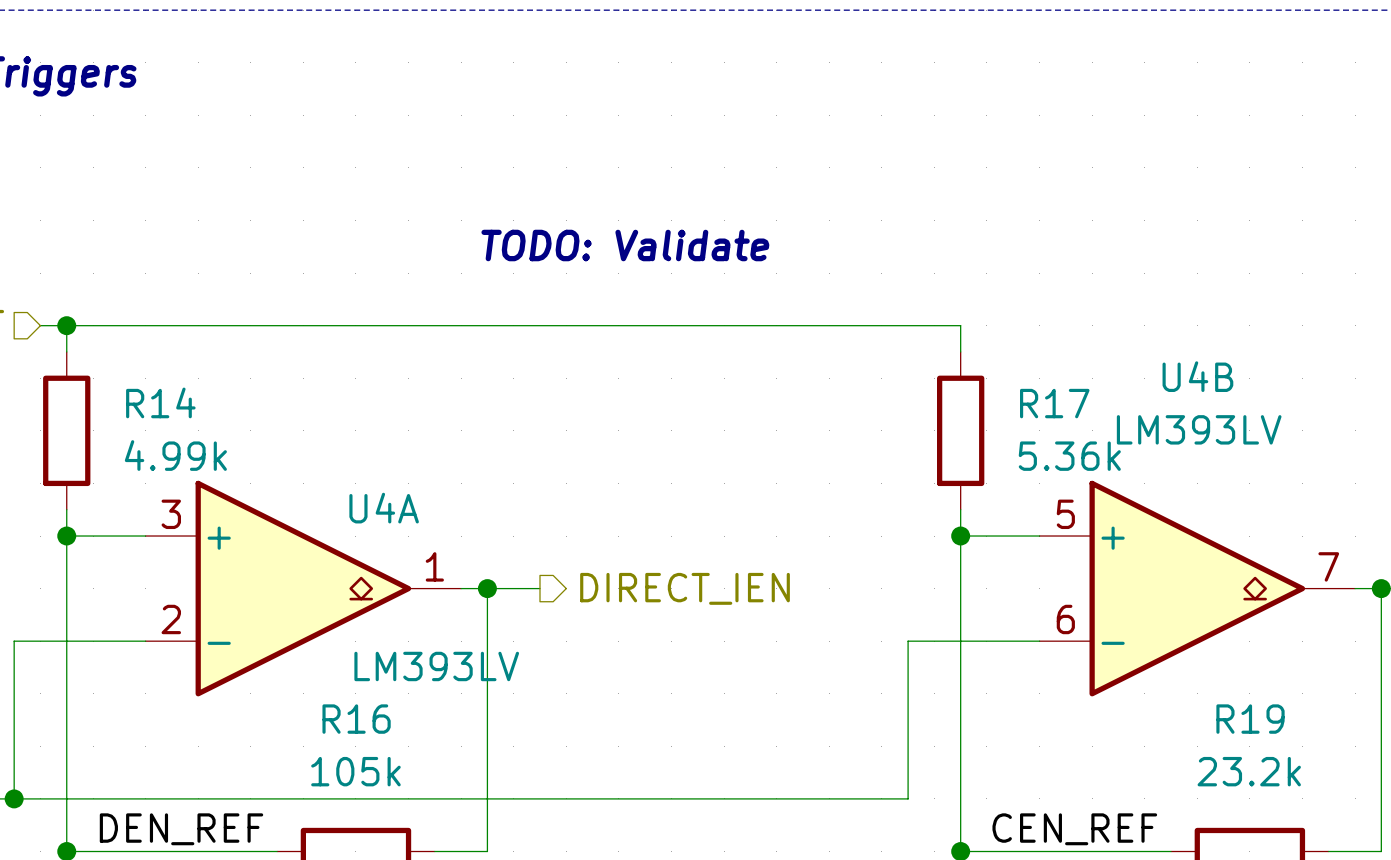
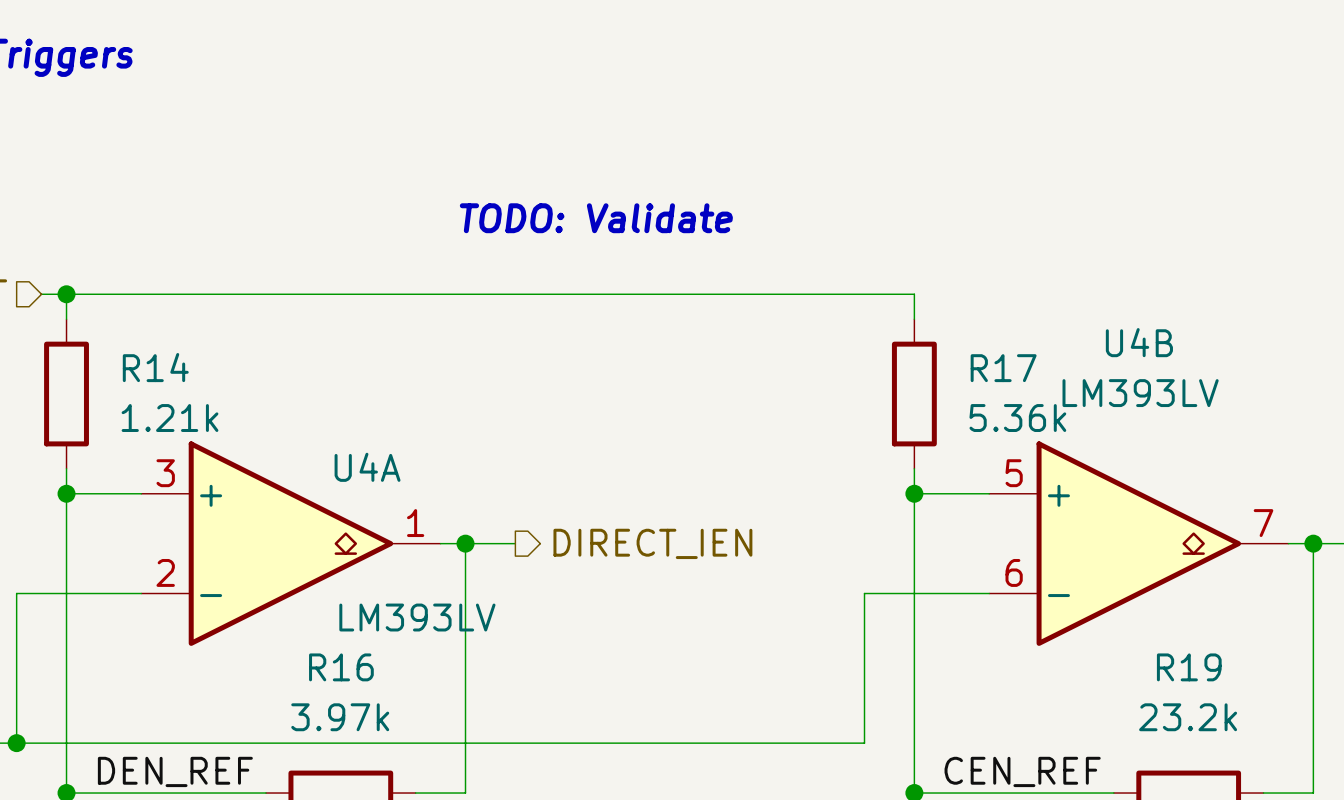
R14 value: 4.99k (175, 455) -> 1.21k (170, 418)
R16 value: 105k (355, 771) -> 3.97k (340, 717)

